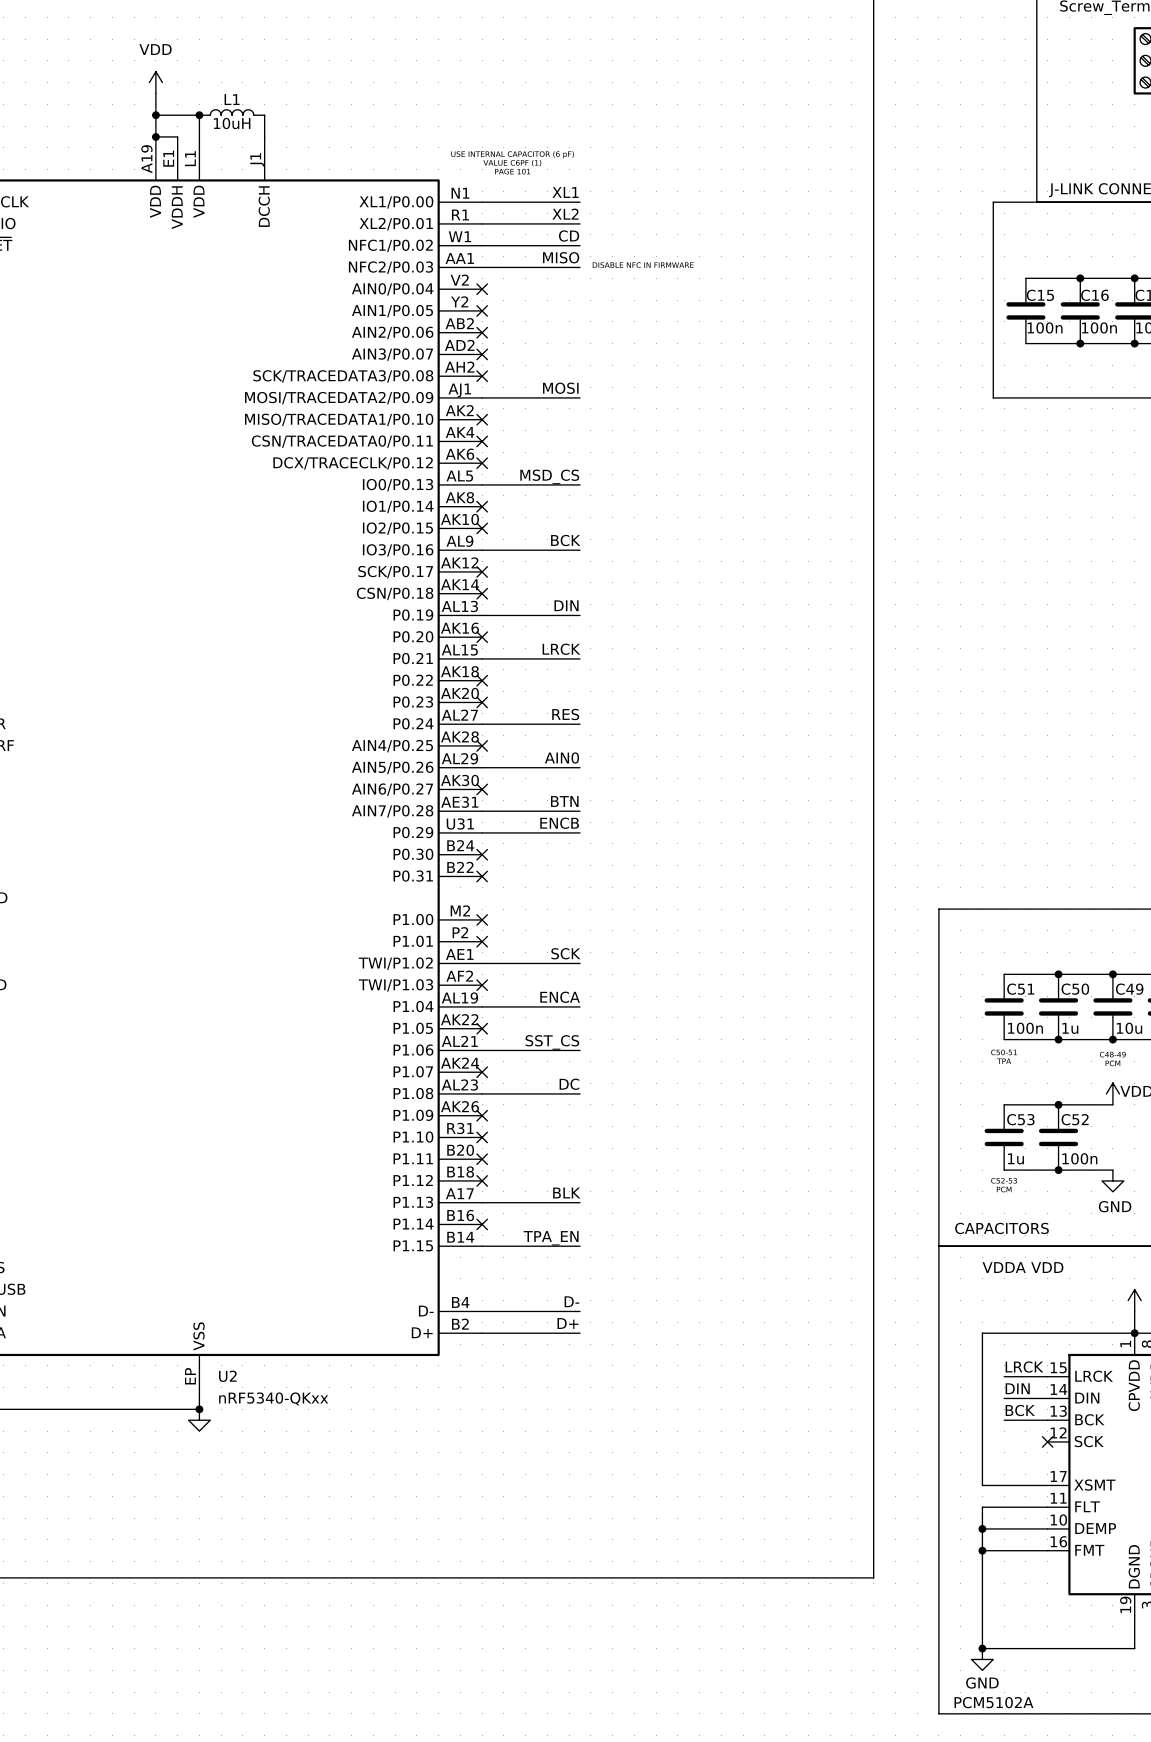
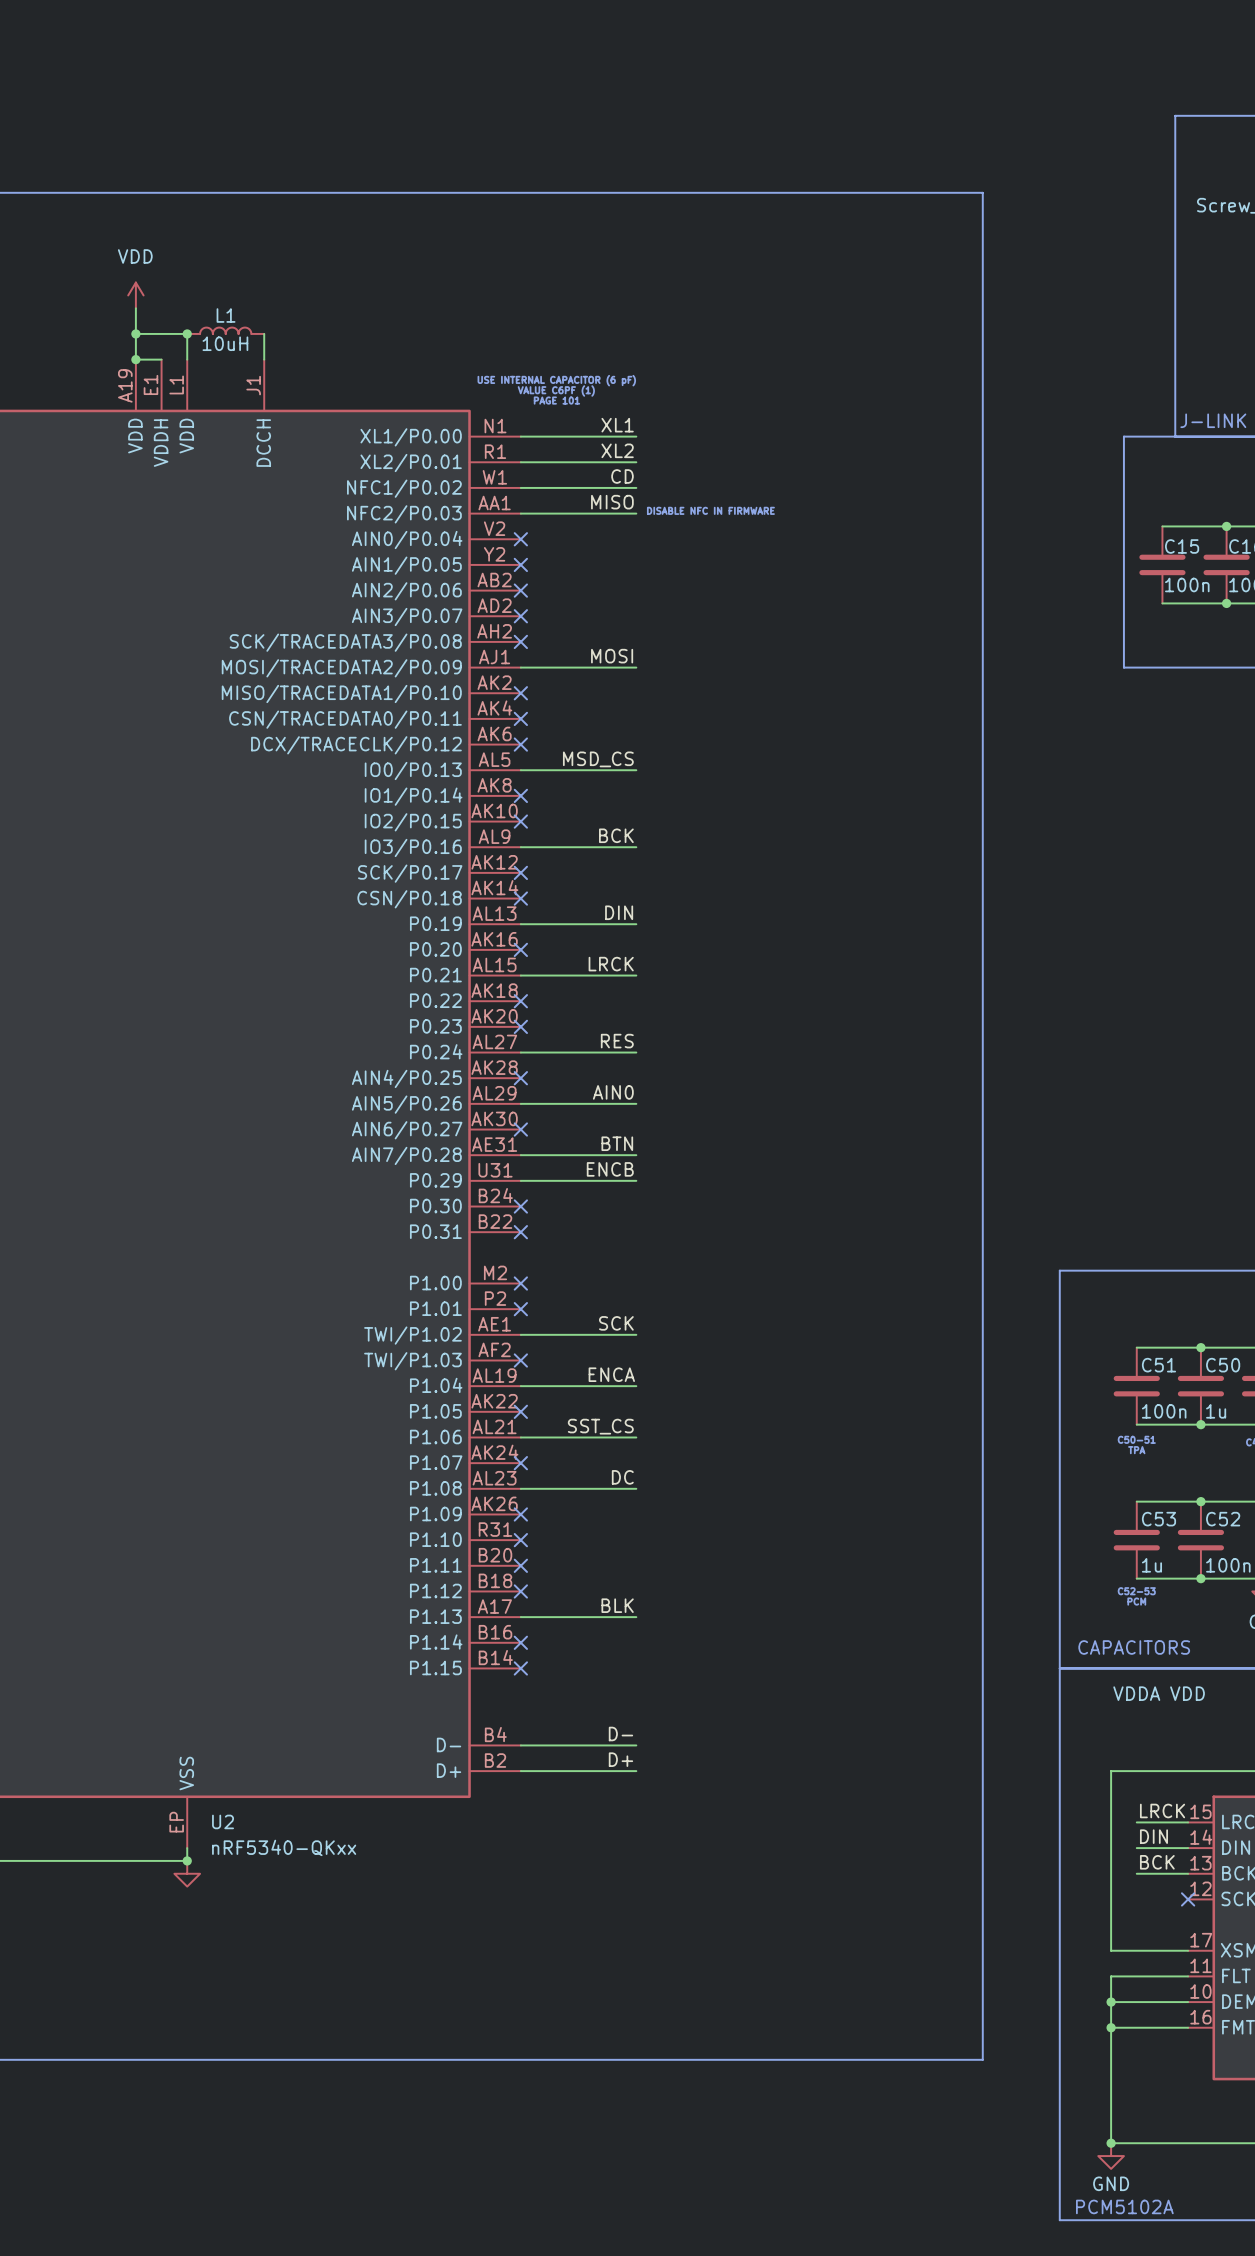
label: TPA_EN (551, 1238) -> none
wire: (482, 1246) (580, 1246) -> none
no-connect mark: none -> (520, 1668)

